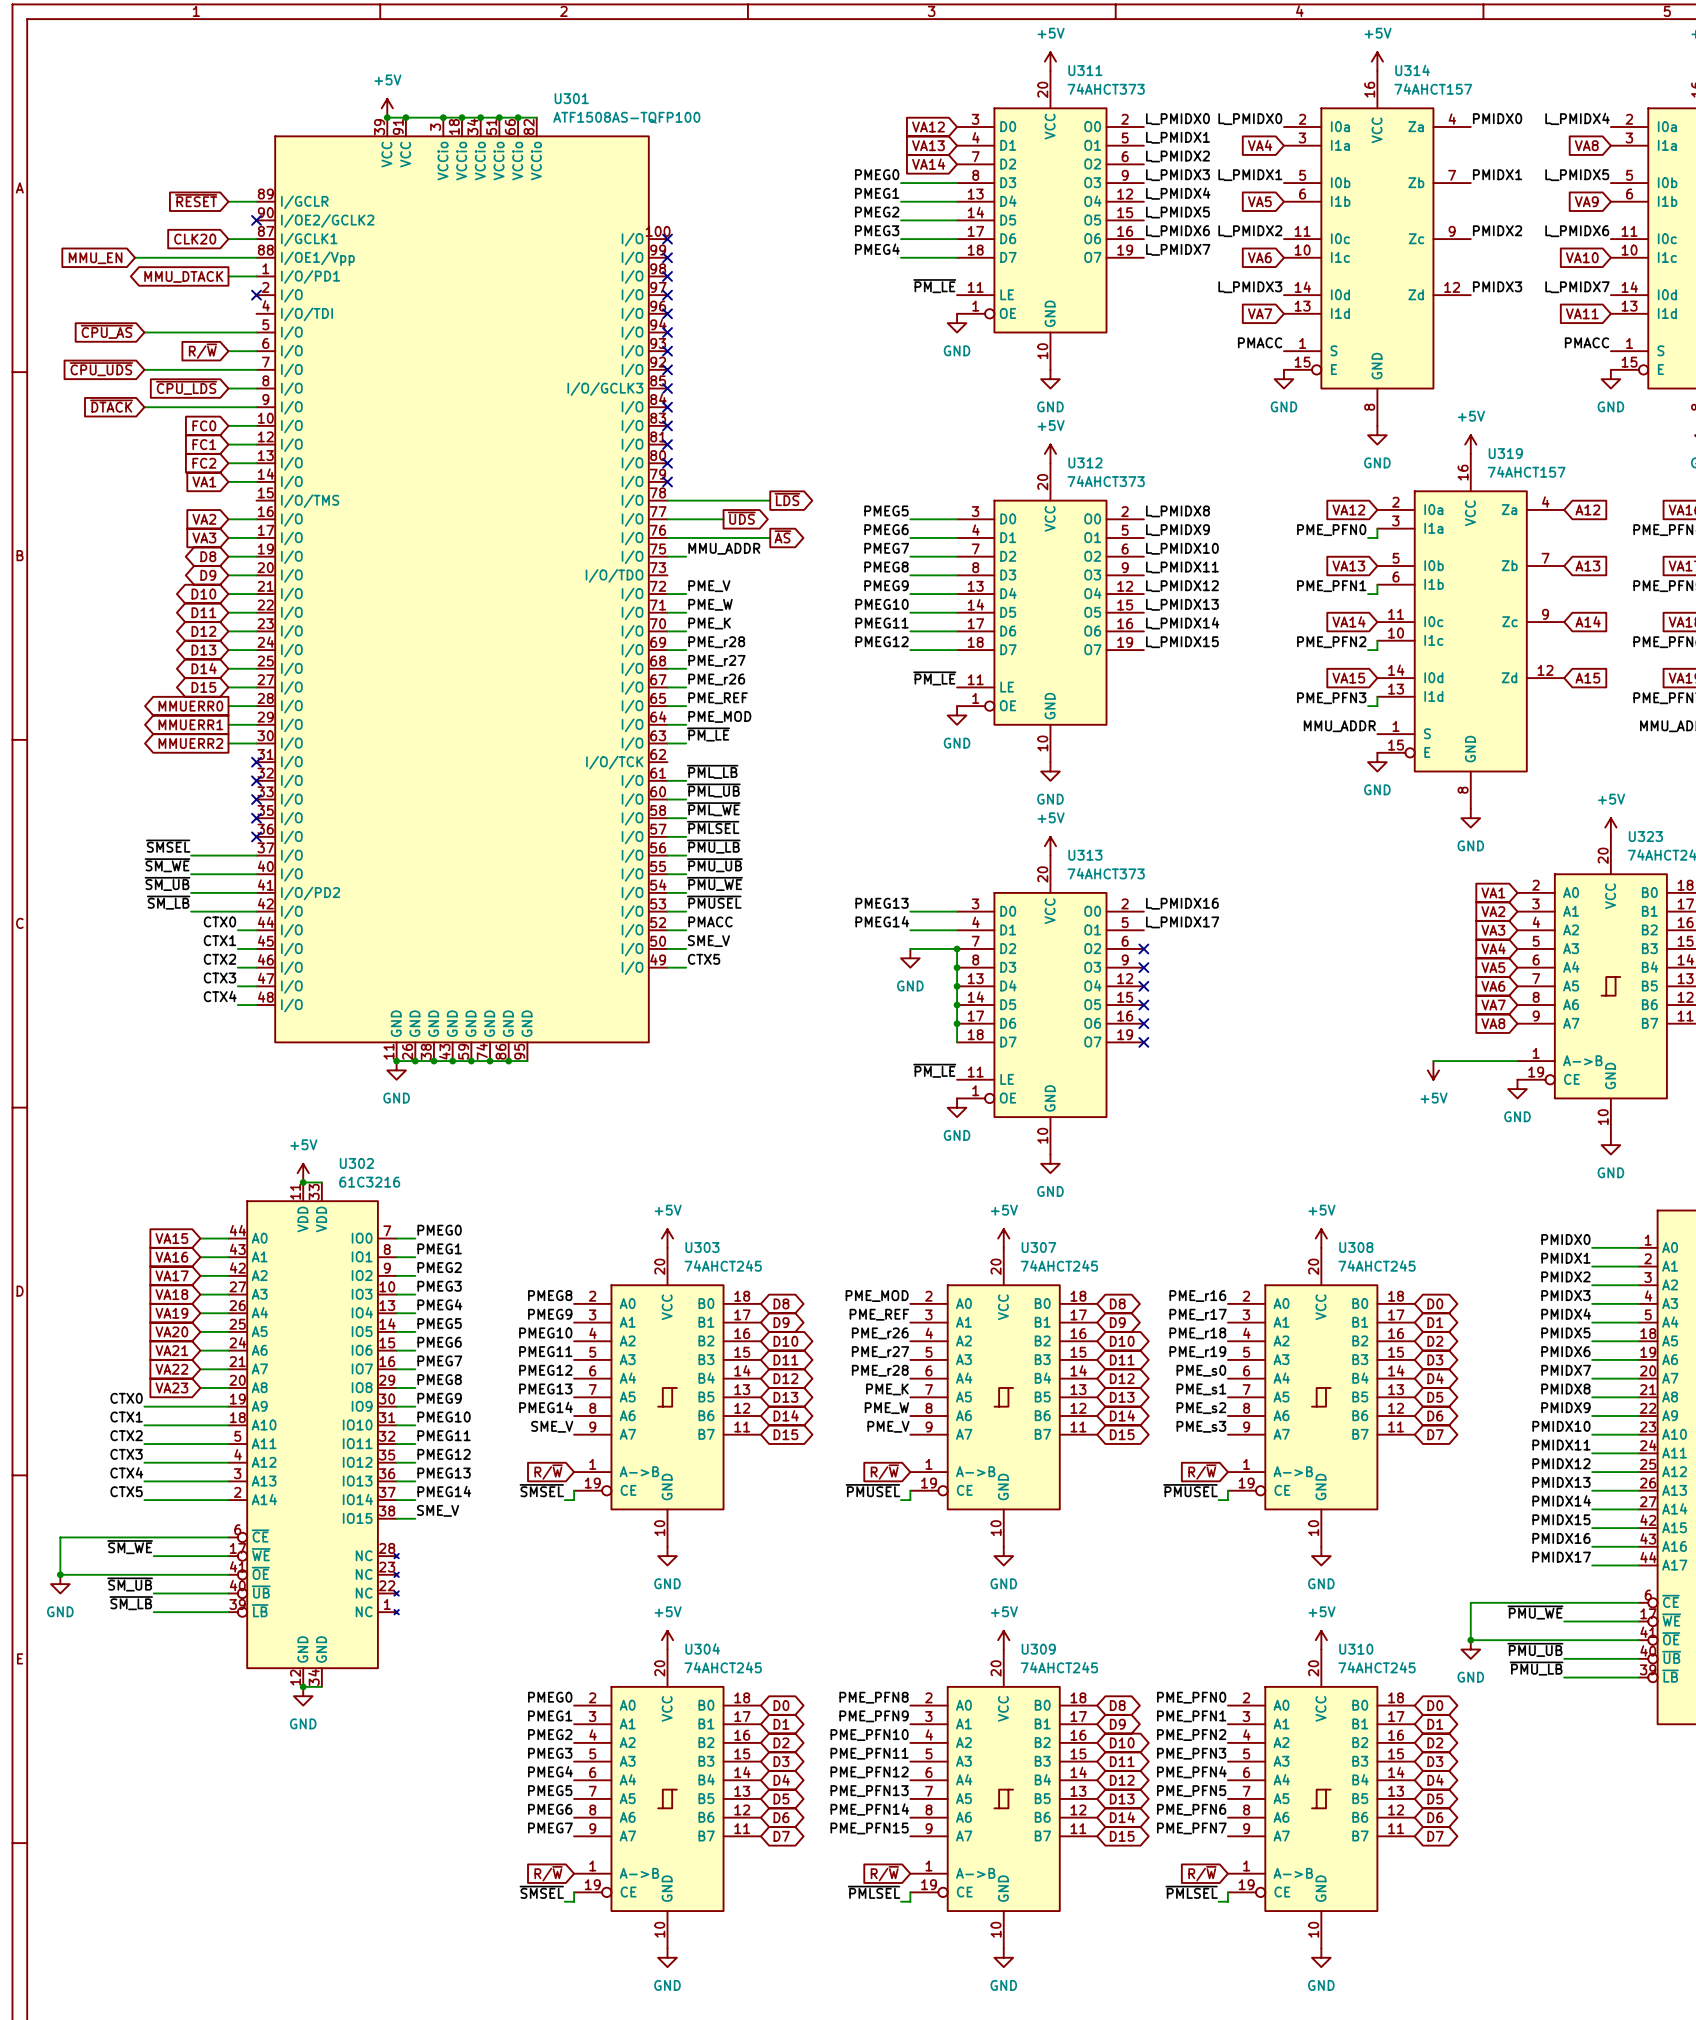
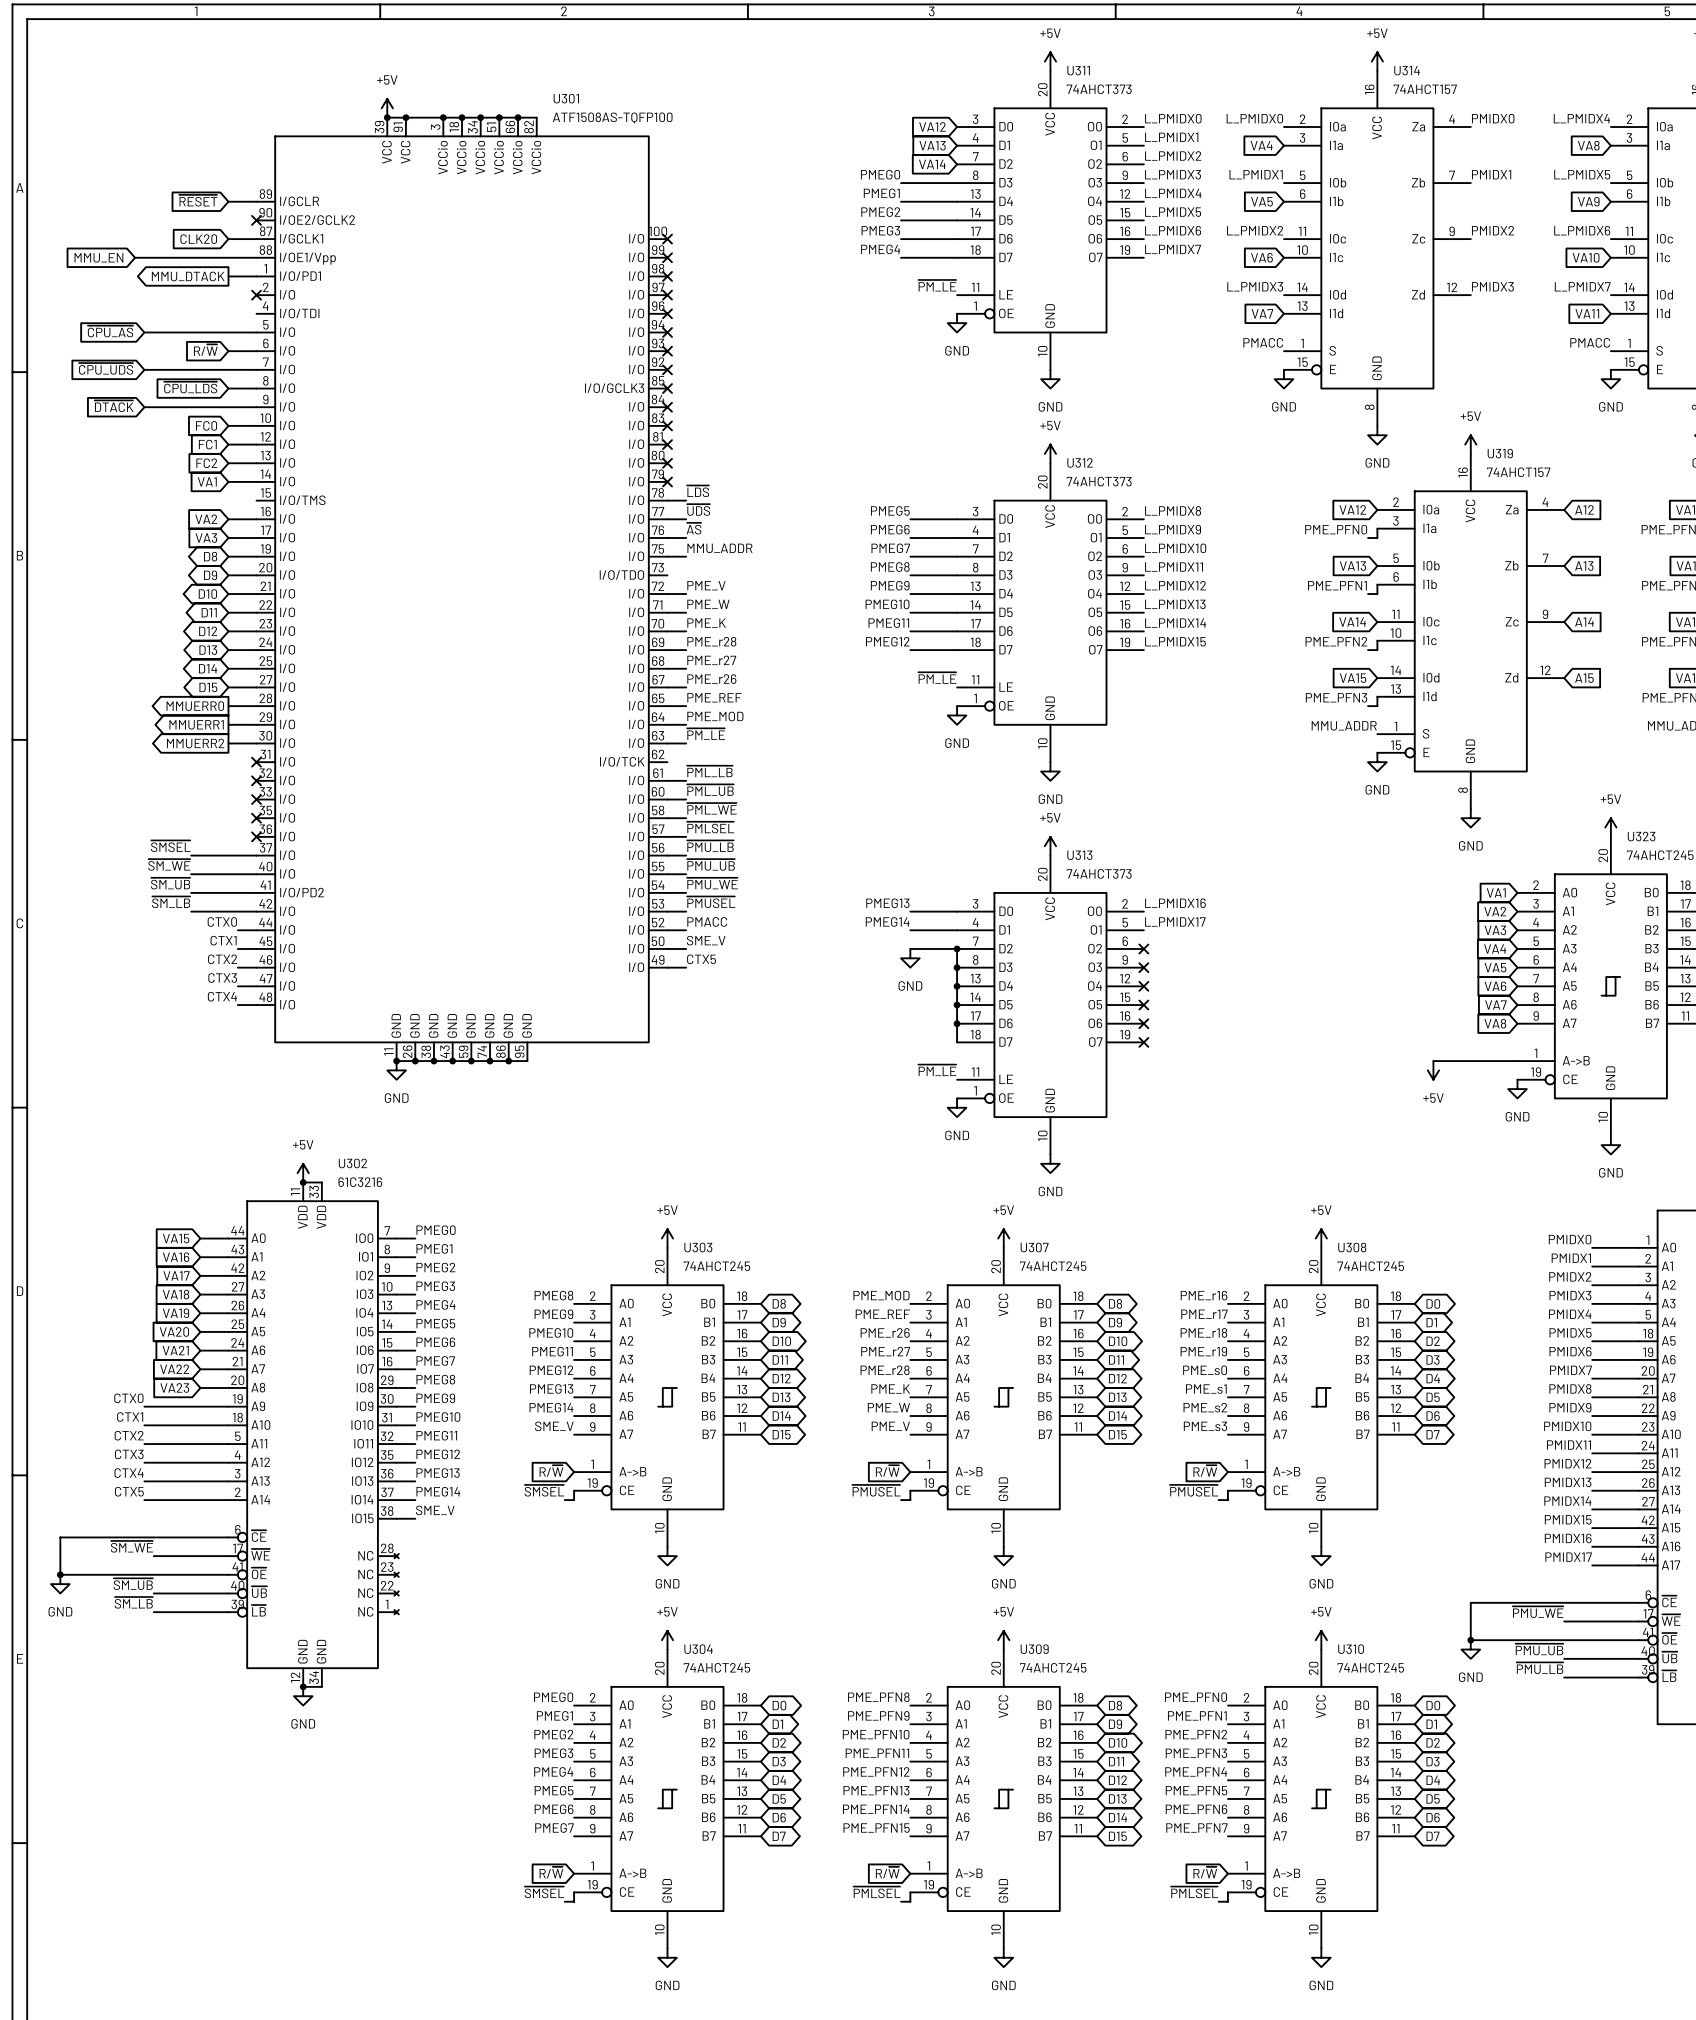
label: none -> ~{LDS} (698, 491)
global label: ~{LDS} (787, 499) -> none
wire: (686, 500) (770, 500) -> none
label: none -> ~{UDS} (698, 509)
global label: ~{UDS} (741, 518) -> none
wire: (686, 519) (723, 519) -> none
label: none -> ~{AS} (693, 528)
global label: ~{AS} (782, 536) -> none
wire: (686, 537) (770, 537) -> none

